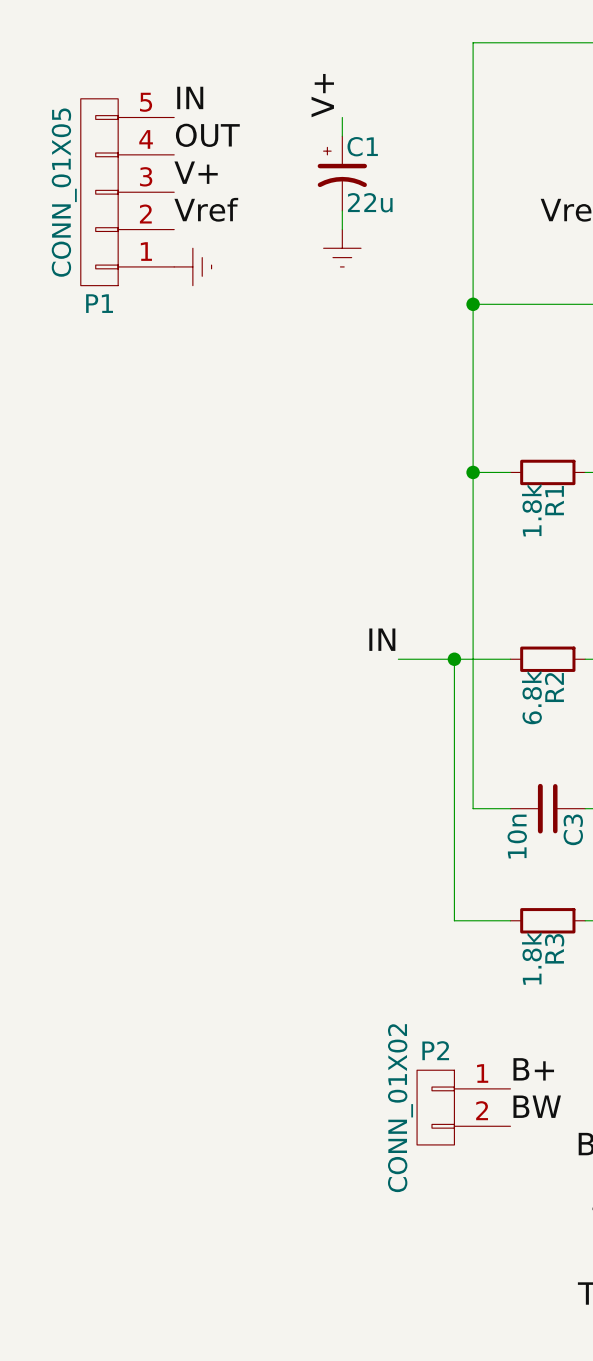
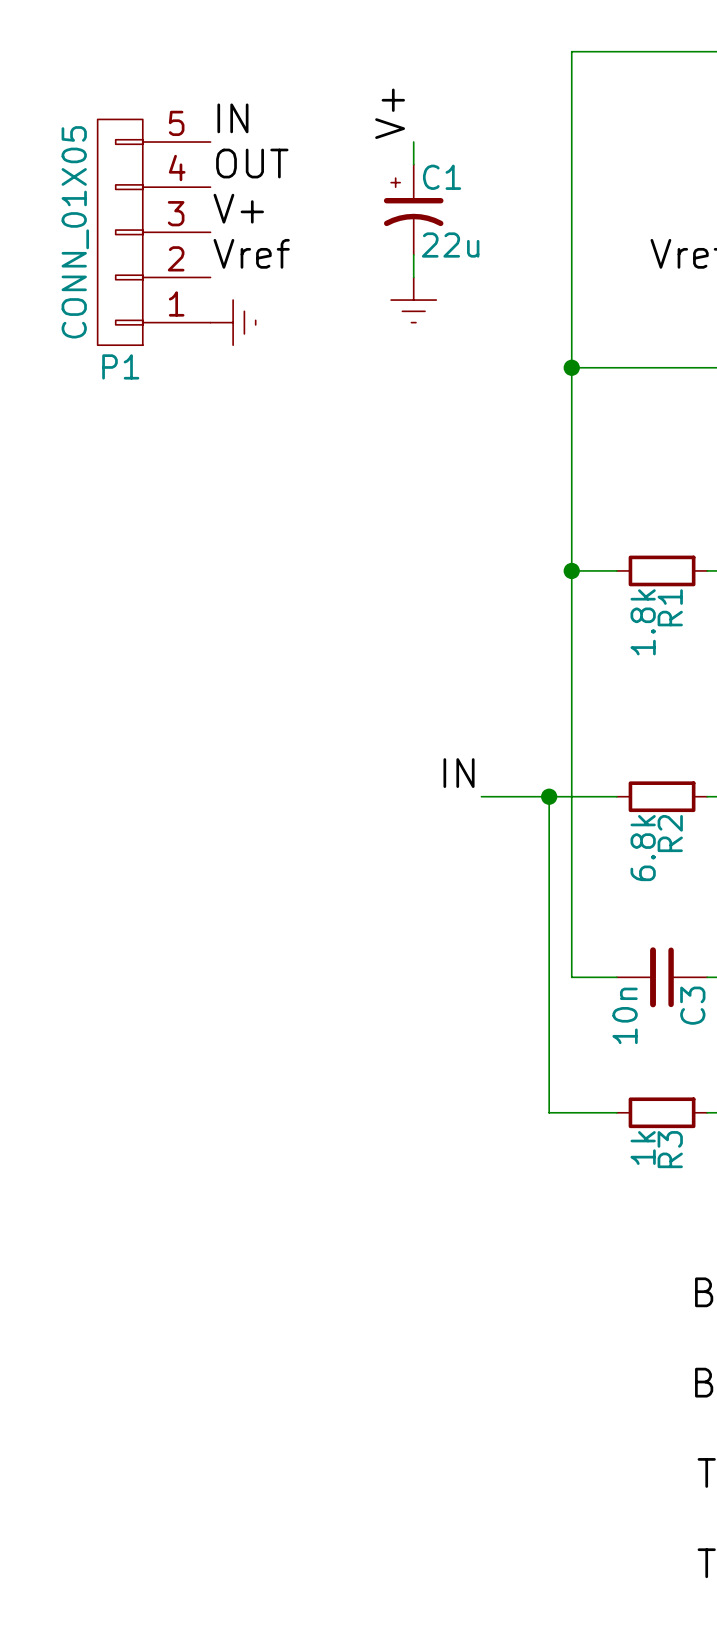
R3 value: 1.8k (531, 958) -> 1k (643, 1148)
label: B+ (533, 1069) -> none
label: BW (537, 1106) -> none
P2: CONN_01X02 (463, 1107) -> none

